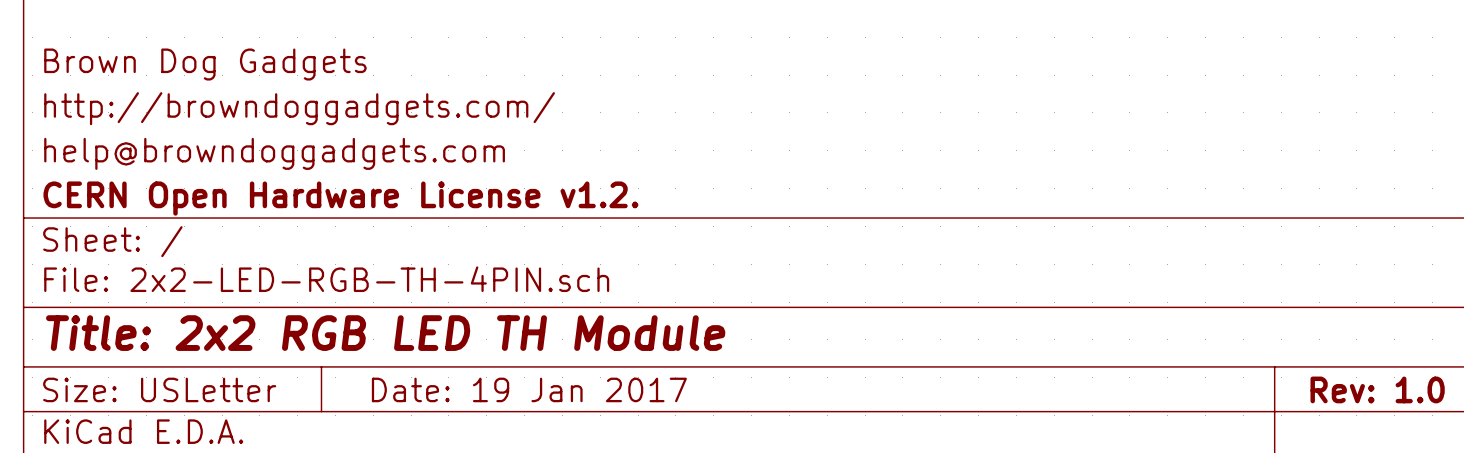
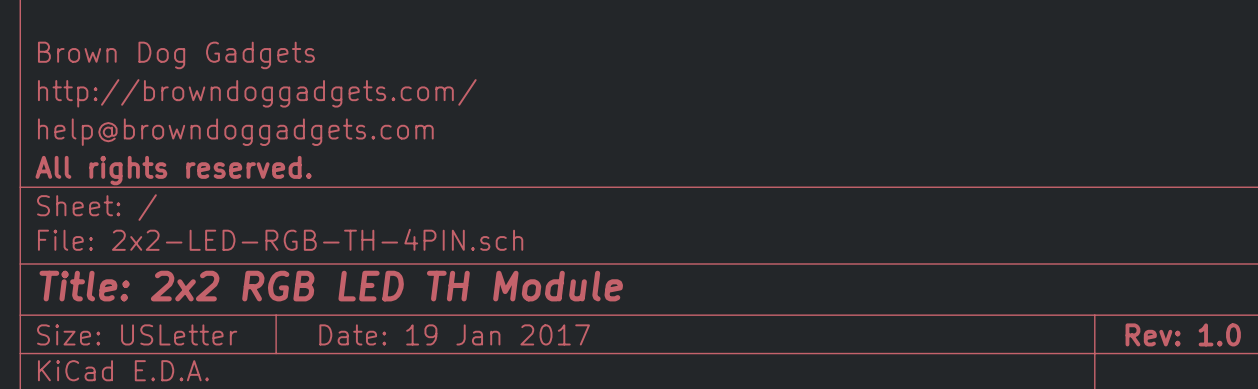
title block: CERN Open Hardware License v1.2. (340, 198) -> All rights reserved. (173, 170)

